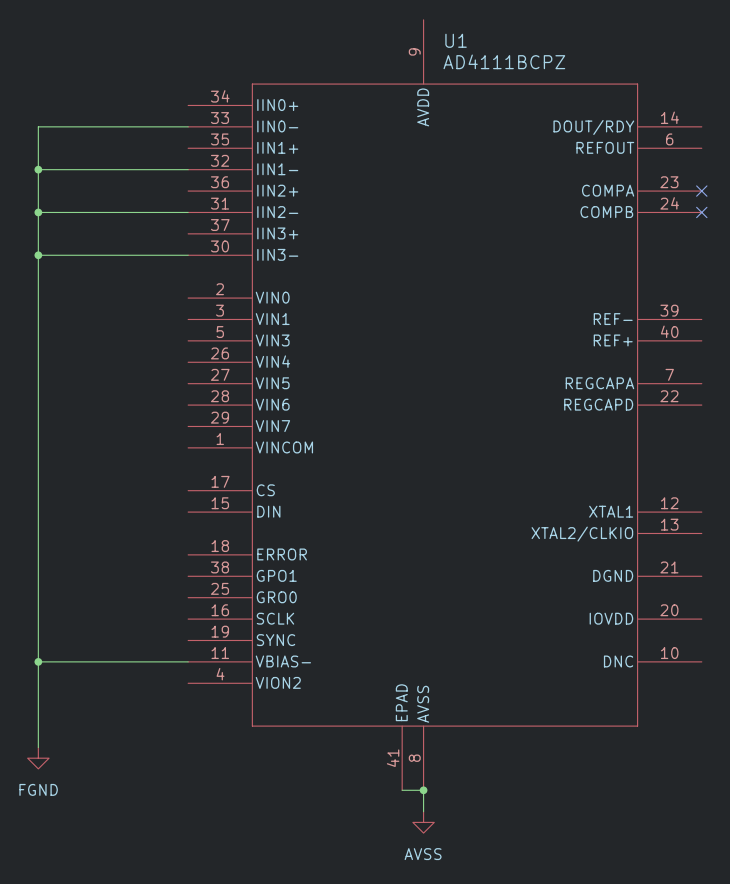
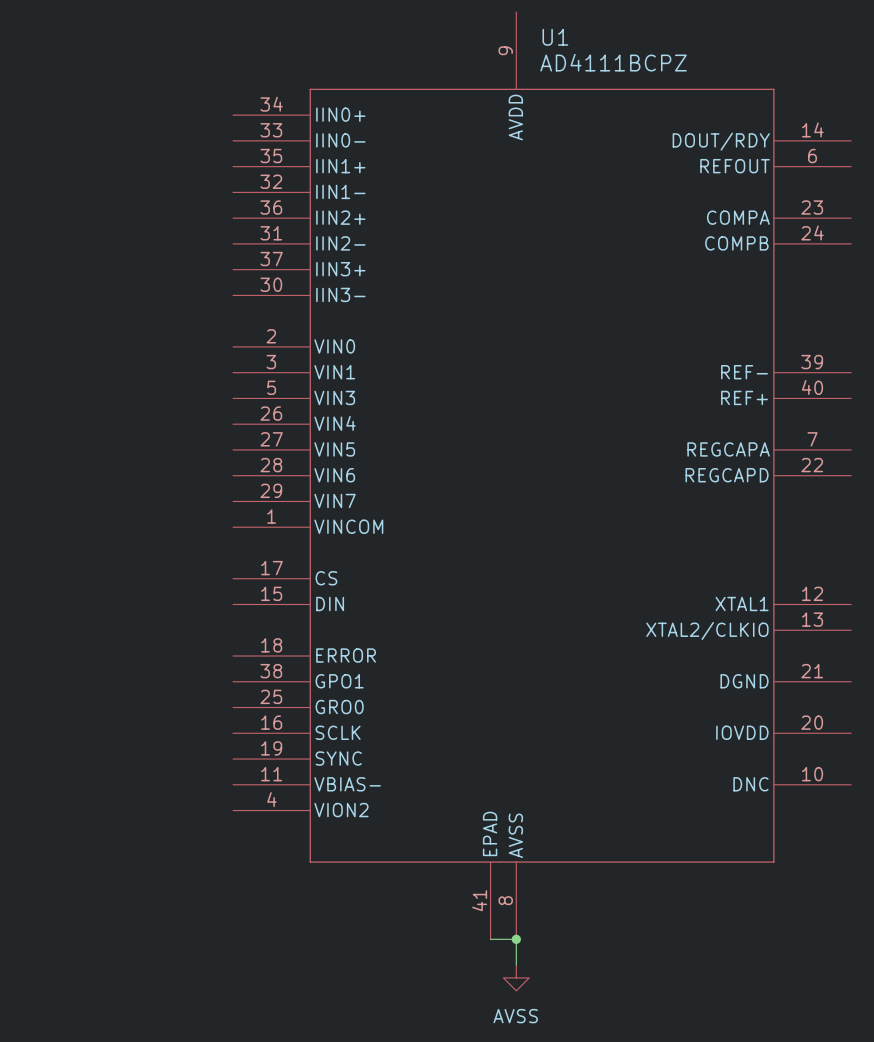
wire: (188, 126) (38, 126) (38, 747) -> none
wire: (38, 169) (188, 169) -> none
junction: (38, 169) -> none
no-connect mark: (701, 191) -> none
wire: (38, 212) (188, 212) -> none
junction: (38, 212) -> none
no-connect mark: (701, 212) -> none
wire: (38, 255) (188, 255) -> none
junction: (38, 255) -> none
wire: (38, 661) (188, 661) -> none
junction: (38, 661) -> none
power symbol: FGND (38, 758) -> none

